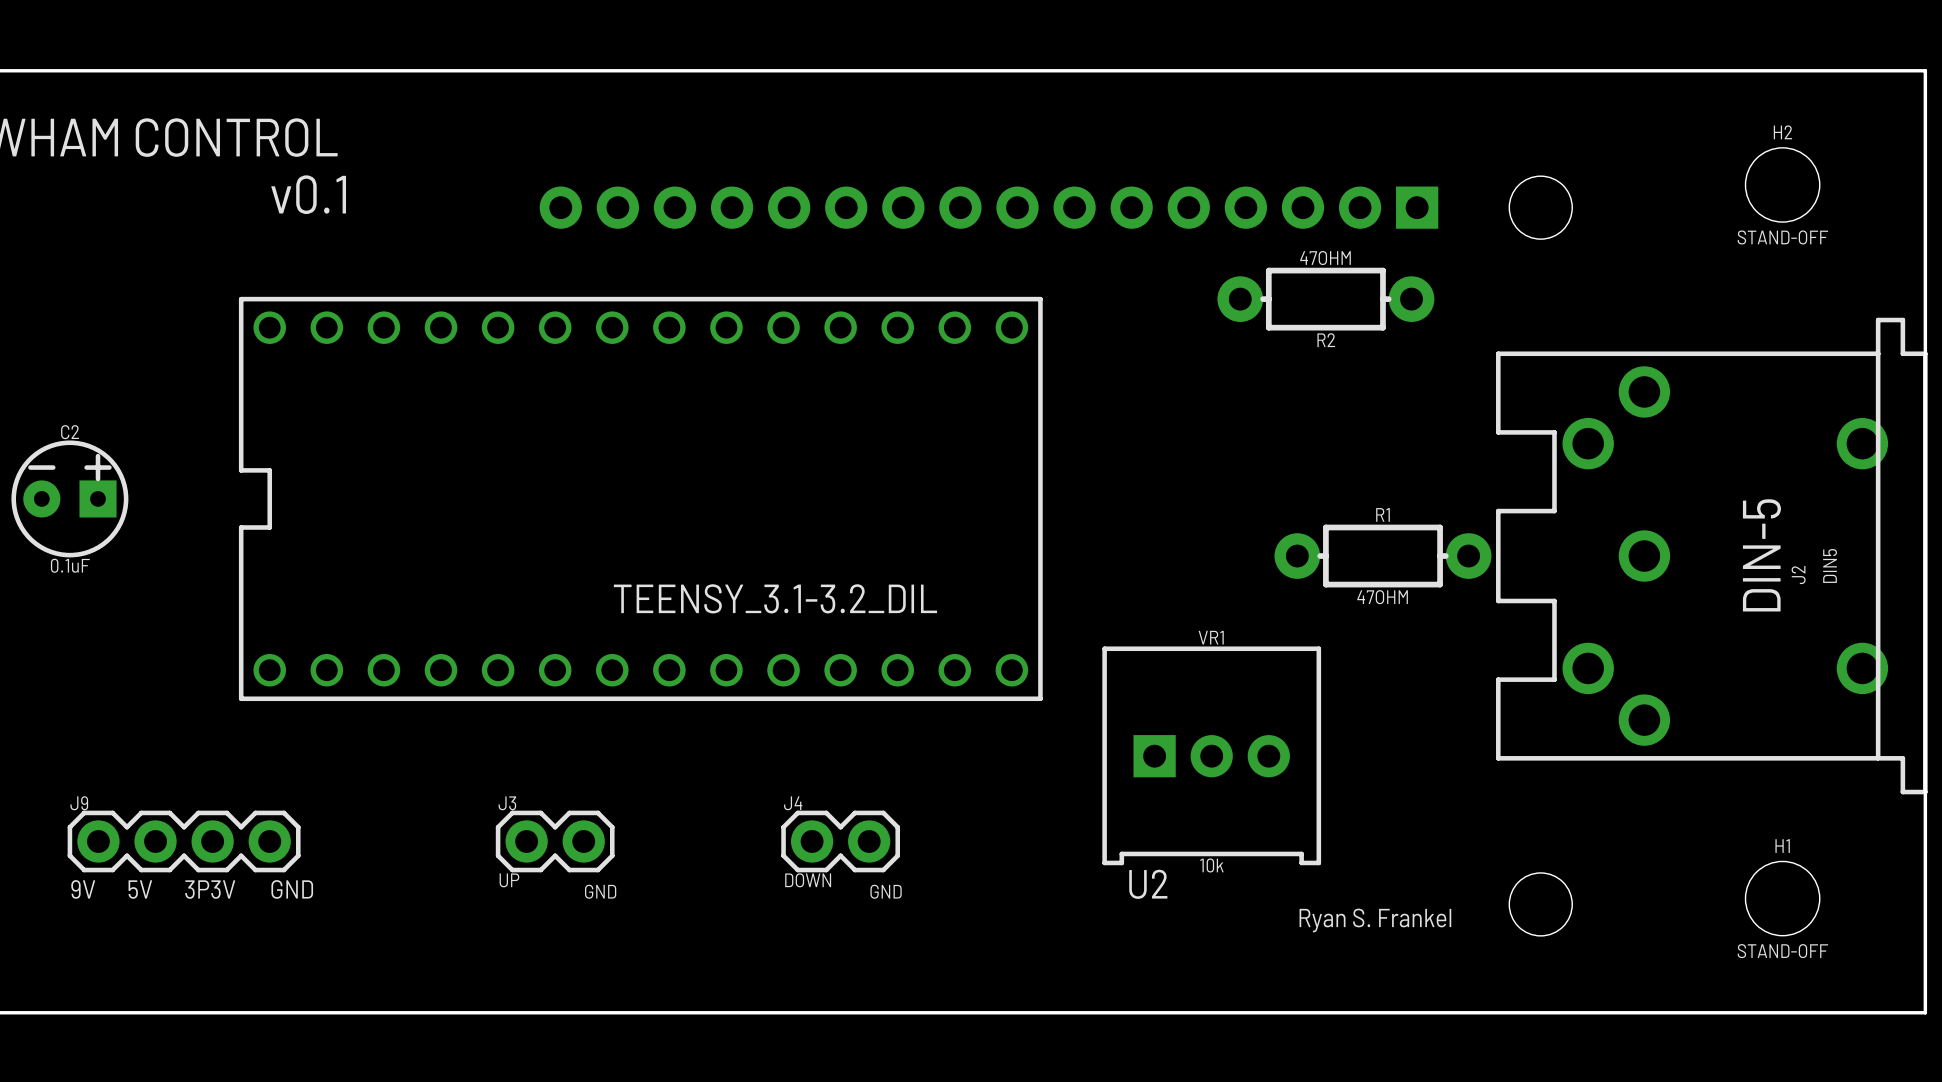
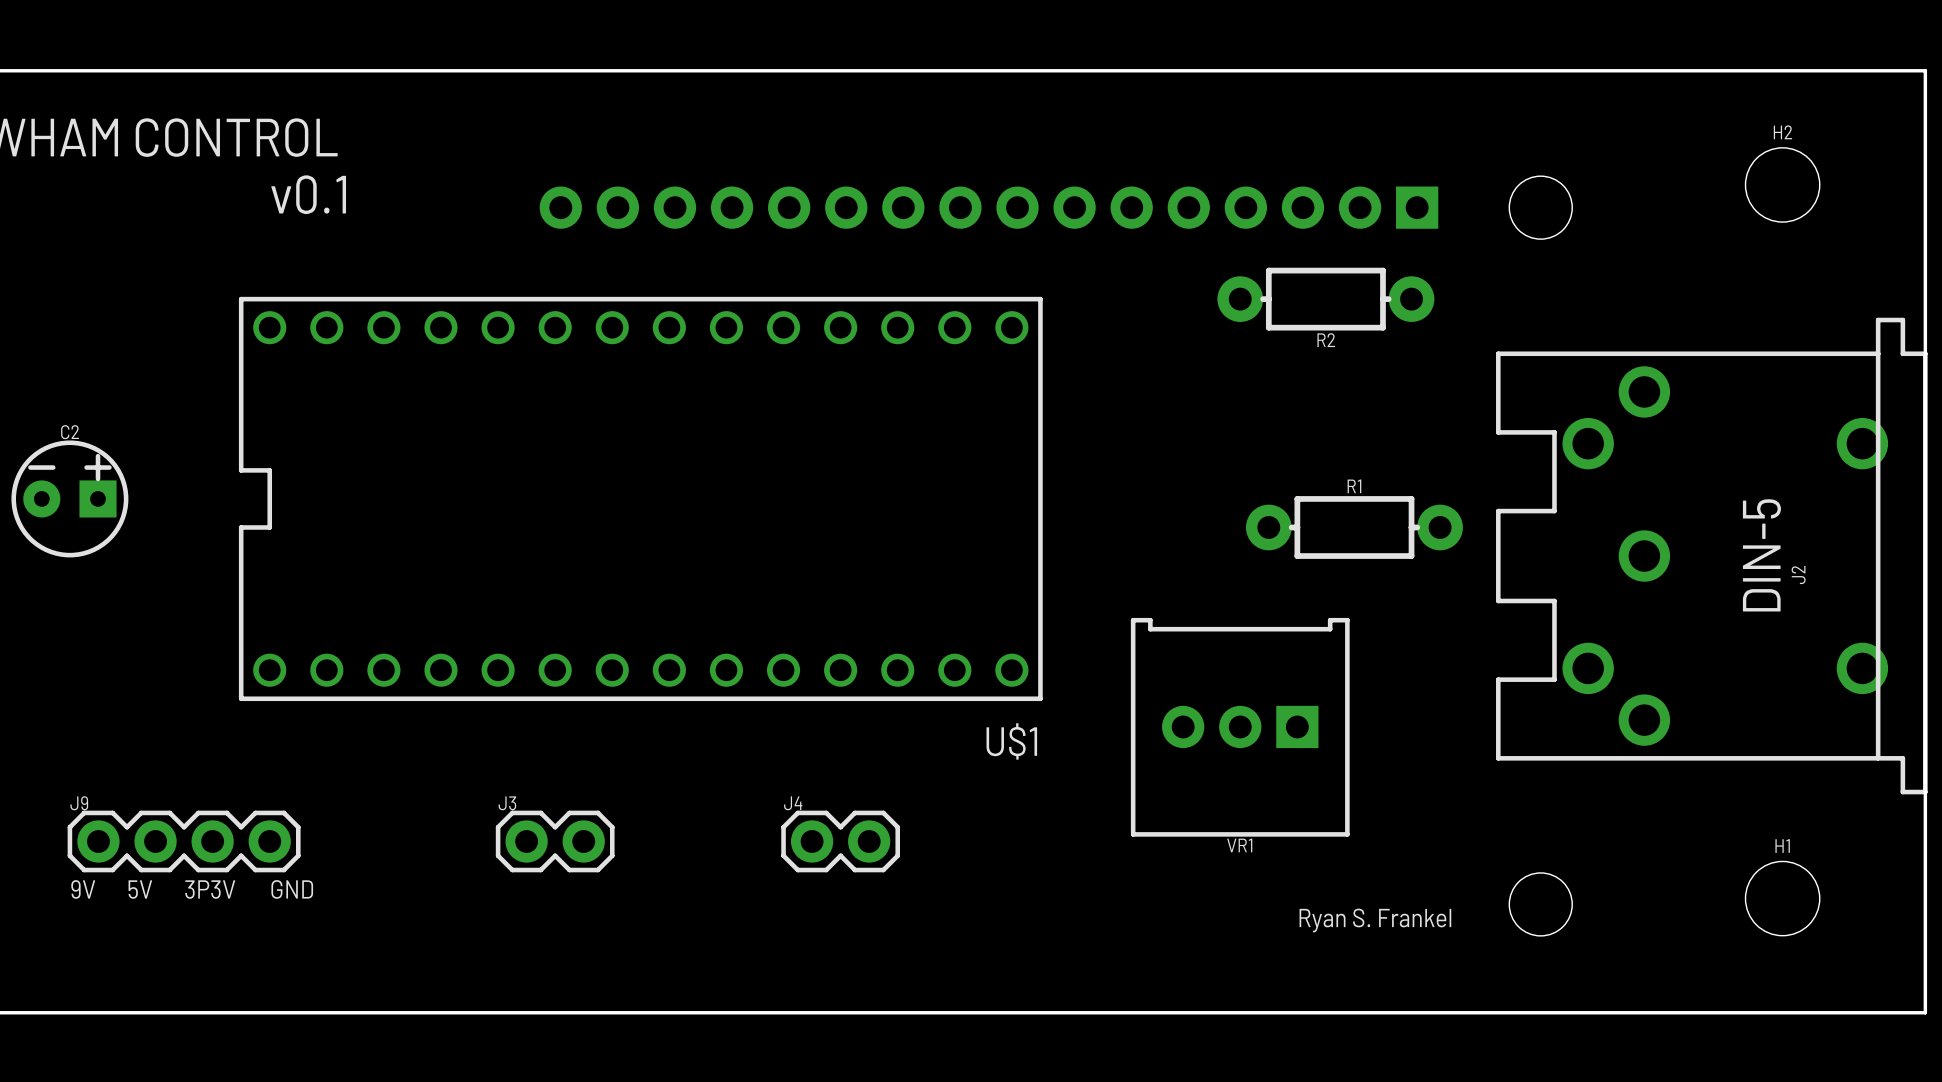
H2 value: STAND-OFF (1782, 237) -> none
R2 value: 47OHM (1325, 258) -> none
U2: TEENSY_3.1-3.2_DIL (640, 498) -> none
U$1: none -> (640, 498)
R1 position: (1382, 556) -> (1354, 527)
C2 value: 0.1uF (70, 565) -> none
J2 value: DIN5 (1830, 565) -> none
R1 value: 47OHM (1382, 597) -> none
VR1 rotation: 0° (1211, 755) -> 180° (1240, 727)
VR1 value: 10k (1211, 865) -> none
J3 value: UP (509, 880) -> none
J4 value: DOWN (808, 880) -> none
text: GND (600, 891) -> none
text: GND (886, 891) -> none
H1 value: STAND-OFF (1782, 951) -> none

